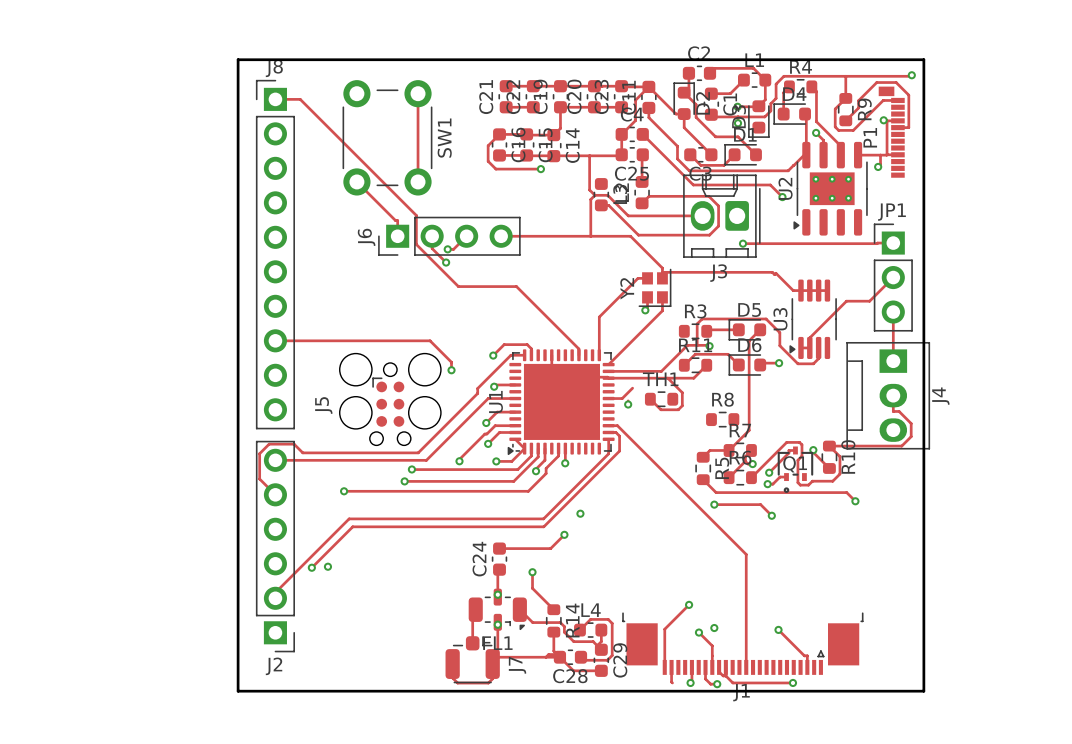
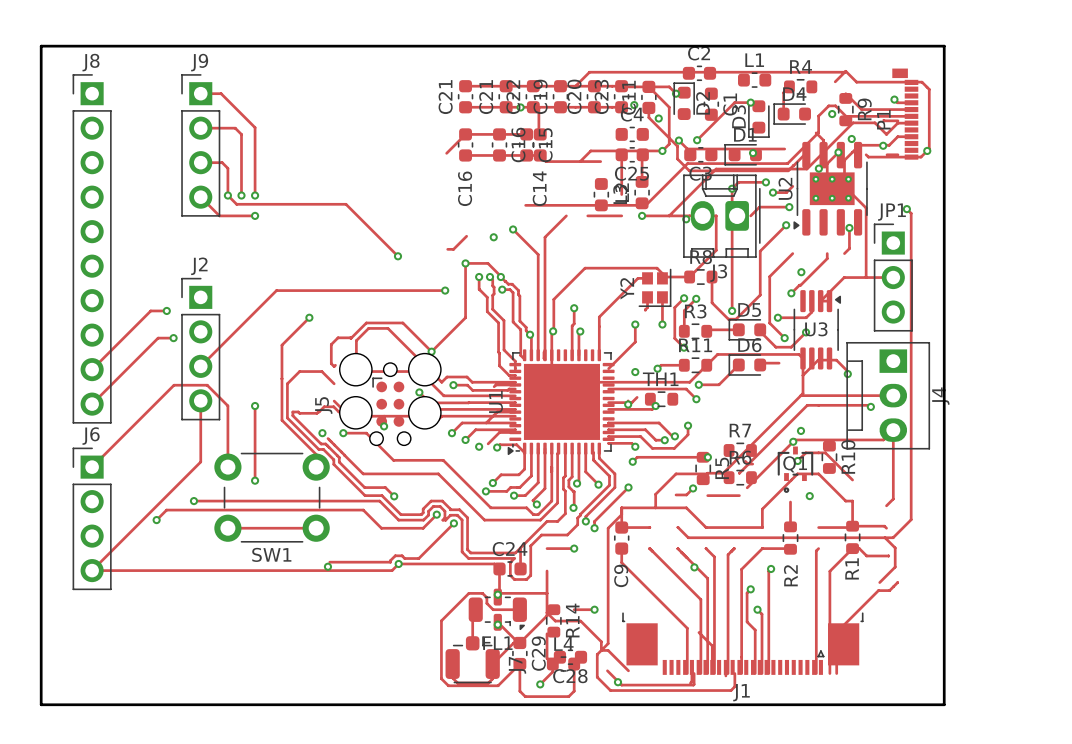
board edge: (238, 59) (923, 59) (923, 691) (238, 691) (238, 59) -> (41, 46) (41, 704) (944, 704) (944, 46) (41, 46)
track: none -> (844, 72) (589, 72) (575, 86)
track: none -> (844, 72) (856, 82) (922, 82) (929, 89) (929, 148) (921, 157) (868, 157) (866, 154)
track: none -> (844, 72) (835, 81)
track: (688, 73) (688, 87) (684, 92) (696, 104) (696, 117) (715, 136) (738, 136) (755, 154) -> none
track: (709, 73) (714, 68) (753, 68) (765, 80) (765, 99) (758, 106) (737, 106) -> none
track: (911, 75) (783, 76) (776, 84) (776, 98) (770, 103) (770, 110) (764, 116) (713, 116) (711, 114) -> none
via: (911, 75) -> none
track: (845, 76) (845, 98) (835, 108) (835, 126) (838, 130) (853, 130) (883, 100) (897, 100) -> none
track: (743, 80) (730, 93) (711, 93) -> none
track: none -> (465, 86) (506, 86)
track: (648, 86) (635, 100) (635, 120) (621, 134) (620, 155) (526, 155) -> (600, 161) (546, 161) (540, 155) (526, 155)
track: none -> (648, 86) (669, 86) (676, 93)
track: (811, 86) (816, 91) (816, 121) (840, 146) (840, 155) -> none
track: none -> (200, 93) (221, 93) (255, 127) (255, 195)
track: (418, 93) (418, 181) -> none
via: none -> (676, 93)
track: none -> (845, 93) (861, 109) (911, 109)
C21: none -> (465, 96)
track: (275, 99) (300, 99) (416, 215) (416, 244) (458, 286) (516, 286) (578, 348) -> (580, 331) (578, 348)
track: none -> (894, 99) (897, 102) (911, 102)
via: none -> (894, 99)
track: none -> (750, 102) (734, 102) (697, 140)
via: none -> (750, 102)
via: none -> (634, 105)
via: (737, 106) -> none
track: none -> (465, 107) (506, 107)
via: none -> (520, 107)
track: (560, 107) (560, 128) (553, 135) (526, 134) -> (560, 107) (538, 107) (538, 134)
track: (669, 107) (676, 114) (684, 114) (684, 127) (711, 154) -> (669, 107) (669, 144) (662, 150)
track: (805, 114) (806, 155) -> none
via: none -> (832, 114)
via: none -> (658, 118)
track: (845, 120) (858, 107) (858, 100) (876, 82) (896, 82) (908, 95) (908, 127) (897, 127) -> none
via: (883, 120) -> none
track: (887, 120) (887, 154) (858, 155) -> none
via: (738, 123) -> none
track: none -> (911, 123) (897, 123) (886, 134) (874, 122) (853, 122) (806, 169) (716, 169) (669, 215)
track: none -> (200, 128) (235, 128) (241, 134) (241, 195)
via: (816, 132) -> none
P1 position: (891, 132) -> (905, 114)
track: (499, 134) (488, 145) (488, 161) (495, 169) (540, 169) -> (499, 134) (465, 134) (446, 153)
track: (642, 134) (693, 184) (770, 184) (782, 197) -> none
track: none -> (911, 136) (897, 136) (889, 145) (859, 145) (844, 160) (844, 186) (866, 208) (866, 277)
SW1 rotation: 0° (387, 137) -> 90° clockwise (272, 497)
SW1 position: (387, 137) -> (272, 497)
via: none -> (851, 139)
track: none -> (678, 140) (687, 149) (784, 149)
via: none -> (678, 140)
via: none -> (697, 140)
C16: none -> (465, 144)
J9: none -> (200, 145)
C14 position: (553, 145) -> (540, 144)
C14 name position: C14 (572, 145) -> C14 (539, 188)
via: none -> (883, 145)
via: none -> (662, 150)
track: none -> (664, 150) (590, 150) (580, 161)
via: none -> (927, 150)
track: none -> (838, 152) (827, 163) (827, 186)
via: none -> (838, 152)
via: none -> (753, 153)
track: (690, 154) (700, 165) (724, 165) (734, 154) -> none
track: none -> (465, 155) (499, 155)
track: (589, 155) (589, 189) (594, 195) -> none
track: (880, 155) (880, 164) (878, 166) -> none
track: none -> (621, 161) (621, 194)
track: none -> (200, 162) (222, 162) (227, 168) (227, 195) (236, 204) (346, 204) (398, 256)
via: (878, 166) -> none
via: none -> (818, 168)
via: (540, 169) -> none
track: (356, 181) (397, 220) (397, 236) -> none
track: none -> (765, 182) (738, 182) (732, 188) (732, 310)
via: none -> (765, 182)
track: none -> (792, 186) (786, 192) (773, 192)
via: none -> (732, 188)
via: none -> (773, 192)
via: none -> (227, 195)
via: none -> (241, 195)
via: none -> (255, 195)
track: (594, 195) (590, 199) (590, 236) -> none
track: (594, 195) (607, 195) (628, 215) (642, 215) -> none
track: none -> (200, 197) (219, 215) (255, 215)
via: (782, 197) -> none
track: (642, 203) (649, 196) (708, 196) (718, 205) (718, 226) (709, 235) (638, 235) (608, 205) -> (911, 116) (846, 116) (835, 105) (828, 105) (818, 116) (818, 132) (787, 163) (687, 163) (645, 205) (608, 205)
track: none -> (789, 207) (759, 207) (750, 215)
via: none -> (789, 207)
via: none -> (906, 209)
via: none -> (255, 215)
track: none -> (566, 215) (545, 237) (545, 359) (543, 352)
track: none -> (587, 215) (621, 215)
via: none -> (642, 215)
track: none -> (702, 215) (716, 215) (716, 250) (689, 277) (662, 278)
via: none -> (686, 219)
track: none -> (786, 225) (760, 251) (760, 295) (736, 319) (728, 319) (712, 302) (712, 277)
via: none -> (786, 225)
track: none -> (849, 227) (849, 248) (844, 253)
via: none -> (849, 227)
track: none -> (513, 229) (538, 254) (538, 359)
via: none -> (513, 229)
track: (432, 236) (432, 248) (446, 262) -> none
J6 rotation: 0° (449, 236) -> 90° clockwise (92, 518)
J6 position: (449, 236) -> (92, 518)
track: (501, 236) (630, 236) (662, 268) (662, 273) -> (551, 355) (553, 299) (585, 268) (657, 268) (662, 273)
via: none -> (493, 237)
via: (742, 243) -> none
track: (893, 243) (742, 243) -> none
via: (447, 249) -> none
track: none -> (792, 253) (769, 276) (769, 323) (784, 338)
track: none -> (827, 253) (827, 258) (791, 293)
J8 position: (275, 254) -> (92, 248)
via: none -> (398, 256)
via: (446, 262) -> none
via: none -> (465, 263)
track: (662, 272) (772, 272) (774, 274) (775, 273) (793, 290) (827, 290) -> none
via: none -> (801, 272)
track: none -> (479, 277) (479, 289) (487, 297) (487, 311) (498, 322) (499, 365) (509, 375) (515, 375)
via: none -> (479, 277)
track: none -> (490, 277) (492, 279) (494, 287) (492, 309) (504, 320) (504, 349) (515, 361) (515, 368)
via: none -> (490, 277)
via: none -> (500, 277)
track: (893, 277) (869, 301) (846, 301) (809, 337) (809, 347) (800, 347) -> (893, 277) (844, 277) (820, 301) (829, 301)
track: none -> (505, 281) (487, 263) (465, 263) (465, 317) (431, 351)
track: none -> (502, 289) (509, 289) (513, 292) (513, 322) (520, 329) (520, 355) (524, 359)
via: none -> (502, 289)
track: none -> (445, 290) (276, 290) (200, 366)
via: none -> (445, 290)
via: none -> (791, 293)
track: none -> (684, 298) (674, 307) (674, 338) (684, 347)
via: none -> (684, 298)
track: none -> (696, 298) (684, 310) (684, 331)
via: none -> (696, 298)
track: none -> (811, 301) (811, 312) (806, 317) (777, 317)
track: none -> (166, 308) (166, 310) (150, 310) (92, 369)
track: none -> (574, 308) (572, 359)
via: none -> (574, 308)
via: none -> (166, 310)
via: (645, 310) -> none
track: (662, 310) (608, 364) -> (662, 310) (662, 324)
via: none -> (732, 310)
track: (893, 312) (893, 361) -> none
track: none -> (309, 317) (281, 345) (281, 420) (316, 454) (316, 467)
via: none -> (309, 317)
via: none -> (777, 317)
U3 name position: U3 (780, 319) -> U3 (816, 329)
U3 rotation: 0° (813, 319) -> 180° (817, 329)
track: none -> (635, 324) (635, 342) (608, 368)
via: none -> (635, 324)
via: none -> (662, 324)
track: none -> (758, 329) (775, 347) (791, 347) (806, 332)
via: none -> (553, 331)
via: none -> (580, 331)
via: none -> (806, 332)
track: (756, 333) (749, 340) (749, 430) (729, 450) (709, 450) (703, 457) -> none
via: none -> (530, 334)
track: none -> (173, 338) (158, 338) (92, 404)
via: none -> (173, 338)
via: none -> (784, 338)
track: (275, 340) (430, 340) (451, 362) (451, 370) -> none
track: (697, 345) (697, 323) (702, 318) (766, 318) (779, 332) (779, 345) (797, 363) (813, 363) (818, 358) (818, 347) -> none
track: (709, 346) (687, 345) (661, 371) (608, 371) -> none
via: (709, 346) -> none
via: none -> (684, 347)
track: (531, 348) (527, 344) (504, 344) (493, 355) -> (531, 348) (531, 336) (519, 321) (518, 290) (512, 284) (505, 281)
track: none -> (431, 351) (402, 322) (366, 322) (350, 338) (338, 337) (331, 344) (331, 363) (334, 366) (335, 365)
via: none -> (431, 351)
via: (493, 355) -> none
track: (524, 355) (510, 355) (477, 388) (477, 393) (418, 452) (302, 452) (294, 444) (269, 444) (259, 453) (259, 479) (275, 494) -> none
via: (779, 363) -> none
track: none -> (684, 365) (661, 365) (657, 368)
track: none -> (706, 365) (717, 354) (798, 354) (803, 358) (803, 393) (800, 395)
track: (738, 365) (728, 354) (695, 354) (684, 365) -> (738, 365) (719, 384) (698, 384)
track: none -> (351, 366) (356, 361) (356, 340) (368, 328) (387, 328) (441, 382) (447, 377) (467, 377) (472, 382) (515, 382)
via: none -> (657, 368)
via: (451, 370) -> none
via: none -> (635, 372)
track: none -> (847, 374) (847, 371) (836, 360) (818, 360) (803, 375)
via: none -> (847, 374)
track: (551, 377) (693, 378) -> (577, 390) (585, 382) (689, 382) (693, 378)
track: (667, 378) (682, 392) (682, 405) (678, 409) (660, 409) (650, 399) -> none
track: none -> (334, 383) (321, 371) (299, 371) (287, 383) (287, 417) (318, 449) (323, 449) (333, 459) (333, 464) (365, 495) (381, 495) (400, 514) (421, 514) (423, 509) (431, 501) (442, 501) (450, 509) (459, 509) (467, 517) (467, 549) (470, 552) (515, 552) (547, 521) (557, 521) (565, 513) (565, 491) (563, 489) (565, 463)
track: none -> (351, 383) (363, 371) (419, 371) (443, 395) (515, 395)
via: none -> (698, 384)
track: none -> (453, 385) (467, 385) (472, 390) (515, 389)
via: none -> (453, 385)
via: (494, 386) -> none
track: (632, 388) (622, 398) (608, 398) -> none
track: none -> (608, 389) (686, 389) (696, 399)
track: none -> (419, 392) (429, 402) (515, 402)
via: none -> (419, 392)
track: none -> (800, 395) (723, 473) (676, 473) (655, 494) (655, 507)
track: (893, 395) (893, 411) (899, 411) (911, 423) -> (893, 395) (800, 395)
track: none -> (637, 397) (631, 402) (608, 402)
track: (515, 398) (488, 398) (426, 460) -> (551, 452) (551, 501) (538, 514) (533, 514) (526, 507) (490, 507) (443, 460) (426, 460)
via: none -> (696, 399)
track: none -> (200, 400) (200, 461) (92, 570) (392, 570) (398, 563) (494, 563) (499, 568) (499, 593)
track: none -> (334, 401) (345, 411) (338, 411) (333, 406) (324, 406) (316, 413) (292, 411) (292, 415) (321, 444) (325, 444) (337, 455) (339, 462) (364, 487) (385, 487) (394, 496)
track: none -> (351, 401) (356, 401) (371, 416) (409, 416) (416, 409) (515, 409)
track: none -> (255, 406) (255, 480)
via: none -> (255, 406)
track: none -> (655, 406) (652, 409) (608, 409)
via: none -> (655, 406)
track: none -> (870, 406) (869, 405) (807, 405) (739, 473)
via: none -> (870, 406)
track: none -> (515, 416) (441, 416) (438, 419) (418, 419)
R8 position: (722, 419) -> (700, 277)
via: (486, 422) -> none
track: none -> (515, 422) (462, 422) (451, 433)
track: none -> (608, 422) (659, 422) (672, 436) (674, 436)
track: (515, 425) (495, 425) (459, 461) -> none
track: (608, 425) (617, 425) (746, 554) (746, 667) -> none
track: none -> (688, 425) (688, 434) (674, 448) (652, 448) (640, 436) (608, 436)
via: none -> (688, 425)
via: none -> (384, 426)
track: none -> (515, 429) (475, 429) (465, 439)
track: none -> (608, 429) (645, 429) (655, 440) (664, 440)
via: none -> (800, 430)
track: (608, 432) (615, 432) (619, 436) (619, 451) (543, 526) (352, 526) (311, 567) -> none
via: none -> (322, 433)
via: none -> (343, 433)
via: none -> (451, 433)
via: none -> (674, 436)
track: (911, 436) (901, 446) (829, 446) (839, 456) (839, 474) (832, 481) (812, 481) (808, 485) (800, 485) (797, 482) (797, 460) (801, 456) (801, 444) (799, 442) (786, 442) (751, 477) -> (911, 436) (911, 519) (893, 537) (688, 537) (677, 527)
track: none -> (328, 438) (344, 455)
via: none -> (465, 439)
track: (515, 439) (524, 448) (511, 461) (496, 461) -> none
track: (608, 439) (608, 453) (543, 518) (349, 518) (275, 592) (275, 598) -> none
J2 footprint: [255, 440, 296, 653] -> [181, 277, 221, 421]
via: none -> (664, 440)
via: none -> (793, 441)
via: (488, 443) -> none
track: none -> (608, 443) (631, 443) (635, 446)
via: none -> (479, 446)
via: none -> (635, 446)
track: none -> (497, 447) (499, 444) (516, 444) (524, 452) (524, 469) (518, 474) (501, 474) (492, 483)
via: none -> (497, 447)
track: (558, 448) (558, 455) (546, 468) (546, 473) (528, 491) (344, 491) -> none
track: (751, 450) (745, 456) (745, 461) (729, 477) -> none
track: (795, 450) (788, 450) (788, 452) (769, 472) -> none
track: (813, 450) (813, 452) (829, 468) -> none
via: (813, 450) -> none
track: none -> (558, 452) (557, 502) (540, 520) (484, 520) (438, 473) (363, 473) (344, 455)
track: none -> (572, 452) (572, 476) (568, 480) (568, 486) (574, 491) (573, 507)
track: none -> (578, 452) (578, 482) (577, 483)
track: none -> (585, 452) (585, 471) (598, 484)
track: none -> (592, 452) (593, 460) (609, 476) (609, 485) (580, 514) (577, 518) (577, 524) (567, 535) (541, 535) (530, 545) (530, 575) (526, 579) (514, 579) (510, 575) (510, 562) (514, 558) (468, 558) (462, 551) (462, 520) (457, 515) (450, 515) (445, 520)
track: none -> (599, 452) (599, 458) (614, 473) (614, 487) (585, 516) (585, 521)
track: (531, 455) (517, 469) (412, 469) -> (531, 455) (531, 475) (519, 487) (510, 487) (506, 491) (485, 491)
track: (538, 456) (513, 481) (404, 481) -> (538, 456) (538, 482) (525, 495) (514, 495)
track: none -> (707, 457) (637, 457) (632, 461)
via: none -> (707, 457)
track: (275, 460) (393, 460) -> (343, 433) (366, 433) (393, 460)
track: (545, 460) (536, 471) -> (545, 460) (545, 488) (532, 500) (536, 504)
track: none -> (797, 460) (805, 452) (825, 452) (852, 480)
via: none -> (797, 460)
via: (459, 461) -> none
via: (496, 461) -> none
via: none -> (632, 461)
via: (565, 463) -> none
via: (752, 464) -> none
track: none -> (92, 467) (174, 385) (207, 385) (227, 405) (227, 467)
via: (411, 469) -> none
via: (536, 471) -> none
via: (769, 472) -> none
track: (786, 477) (779, 477) (772, 484) (767, 484) -> none
track: (703, 479) (716, 492) (846, 492) (855, 501) -> none
via: none -> (255, 480)
via: (404, 481) -> none
via: none -> (492, 483)
via: none -> (577, 483)
via: none -> (598, 484)
via: (767, 484) -> none
track: none -> (628, 487) (594, 521) (594, 528)
via: none -> (628, 487)
track: none -> (747, 487) (795, 439) (883, 439) (893, 430) (893, 499) (886, 505)
track: none -> (693, 488) (686, 494) (676, 494)
via: none -> (693, 488)
via: (344, 491) -> none
via: none -> (485, 491)
via: none -> (514, 495)
track: none -> (707, 495) (739, 495)
via: none -> (394, 496)
via: none -> (809, 496)
track: none -> (193, 501) (379, 501) (398, 520) (423, 520) (433, 506) (440, 506) (444, 511) (444, 518) (442, 520) (445, 520)
via: none -> (193, 501)
via: (855, 501) -> none
track: none -> (790, 502) (790, 526)
via: none -> (536, 504)
track: (714, 504) (760, 504) (771, 515) -> none
via: (714, 504) -> none
via: none -> (573, 507)
via: (580, 513) -> none
track: none -> (436, 514) (423, 528) (381, 528) (363, 510) (166, 510) (156, 520)
via: none -> (436, 514)
track: none -> (621, 514) (608, 528) (608, 643) (597, 654) (597, 677) (610, 690) (731, 690) (734, 686) (734, 673)
via: (771, 515) -> none
via: none -> (156, 520)
via: none -> (585, 521)
track: none -> (453, 523) (418, 558) (404, 558) (402, 555) (395, 555) (390, 562) (329, 562)
via: none -> (453, 523)
track: none -> (852, 526) (884, 526) (886, 528)
track: none -> (852, 526) (852, 501) (845, 501) (818, 473) (797, 473) (762, 509) (762, 527) (706, 527) (686, 507) (621, 507) (621, 527) (649, 527)
track: none -> (852, 526) (818, 527)
track: none -> (227, 528) (316, 528)
via: none -> (594, 528)
track: (564, 534) (550, 548) -> (574, 548) (550, 548)
via: (564, 534) -> none
R1: none -> (852, 537)
track: none -> (885, 537) (895, 547) (895, 567) (879, 582)
C9: none -> (621, 538)
R2: none -> (790, 538)
track: none -> (520, 547) (520, 568)
track: (499, 548) (547, 548) -> none
via: none -> (574, 548)
track: none -> (621, 548) (621, 562) (687, 628) (687, 673)
track: none -> (677, 548) (694, 565)
track: none -> (706, 548) (714, 556) (714, 673)
track: none -> (734, 548) (728, 554) (728, 673)
track: none -> (818, 548) (816, 550) (816, 673)
track: none -> (650, 549) (649, 548) (650, 549)
track: none -> (650, 549) (700, 599) (700, 673)
track: none -> (790, 549) (762, 548) (741, 569) (741, 673)
track: none -> (888, 555) (866, 555) (859, 548) (852, 548) (829, 571) (829, 673)
C24 rotation: 0° (499, 559) -> 90° clockwise (510, 568)
via: none -> (398, 563)
track: none -> (694, 565) (707, 578) (707, 673)
via: (311, 567) -> none
via: none -> (694, 567)
track: none -> (771, 568) (768, 571) (768, 673)
via: none -> (771, 568)
track: (499, 569) (497, 571) (497, 594) -> (547, 593) (497, 594)
track: (532, 572) (532, 588) (553, 609) -> none
via: (532, 572) -> none
track: none -> (897, 582) (889, 590) (878, 590) (836, 632) (836, 673)
track: none -> (750, 589) (747, 592) (747, 621) (755, 630) (755, 673)
via: none -> (750, 589)
track: (689, 604) (664, 629) (664, 667) -> none
via: (689, 604) -> none
track: (519, 609) (532, 622) (560, 622) (564, 626) (564, 632) (573, 641) (593, 641) (601, 649) -> (519, 609) (493, 609) (486, 603) (486, 597) (482, 593) (468, 593) (441, 620) (441, 678) (448, 685) (498, 685) (519, 664) (519, 691) (525, 696) (568, 696) (574, 691) (574, 664)
track: none -> (574, 609) (594, 609)
via: none -> (594, 609)
track: none -> (757, 609) (762, 614) (762, 673)
via: none -> (757, 609)
track: none -> (547, 612) (555, 621) (580, 621) (601, 641) (601, 650) (608, 650) (628, 670)
track: none -> (497, 622) (518, 642)
track: (497, 624) (497, 658) -> (547, 571) (547, 615) (519, 642) (513, 642) (497, 658)
via: (714, 628) -> none
track: (778, 629) (804, 655) (807, 655) (807, 667) -> none
via: (778, 629) -> none
track: (579, 630) (590, 619) (608, 619) (612, 623) (612, 655) (607, 660) (584, 660) (580, 657) -> none
L4 position: (590, 630) -> (563, 664)
track: (601, 630) (601, 641) (597, 645) -> none
track: (553, 632) (553, 651) (556, 653) (548, 654) (546, 657) -> none
via: (698, 632) -> none
track: none -> (547, 633) (547, 658) (552, 664) (552, 671) (540, 684)
track: (497, 657) (559, 657) (573, 670) (601, 670) -> none
C29 position: (601, 660) -> (519, 653)
J2 name position: J2 (274, 666) -> J2 (199, 266)
track: (671, 667) (672, 682) -> none
track: (705, 667) (705, 678) (710, 684) (717, 684) -> none
track: (719, 667) (719, 671) (732, 682) (792, 682) -> none
track: none -> (607, 670) (621, 685) (693, 685) (694, 673)
via: none -> (617, 682)
via: (690, 682) -> none
via: (792, 682) -> none
via: none -> (540, 684)
via: (717, 684) -> none

